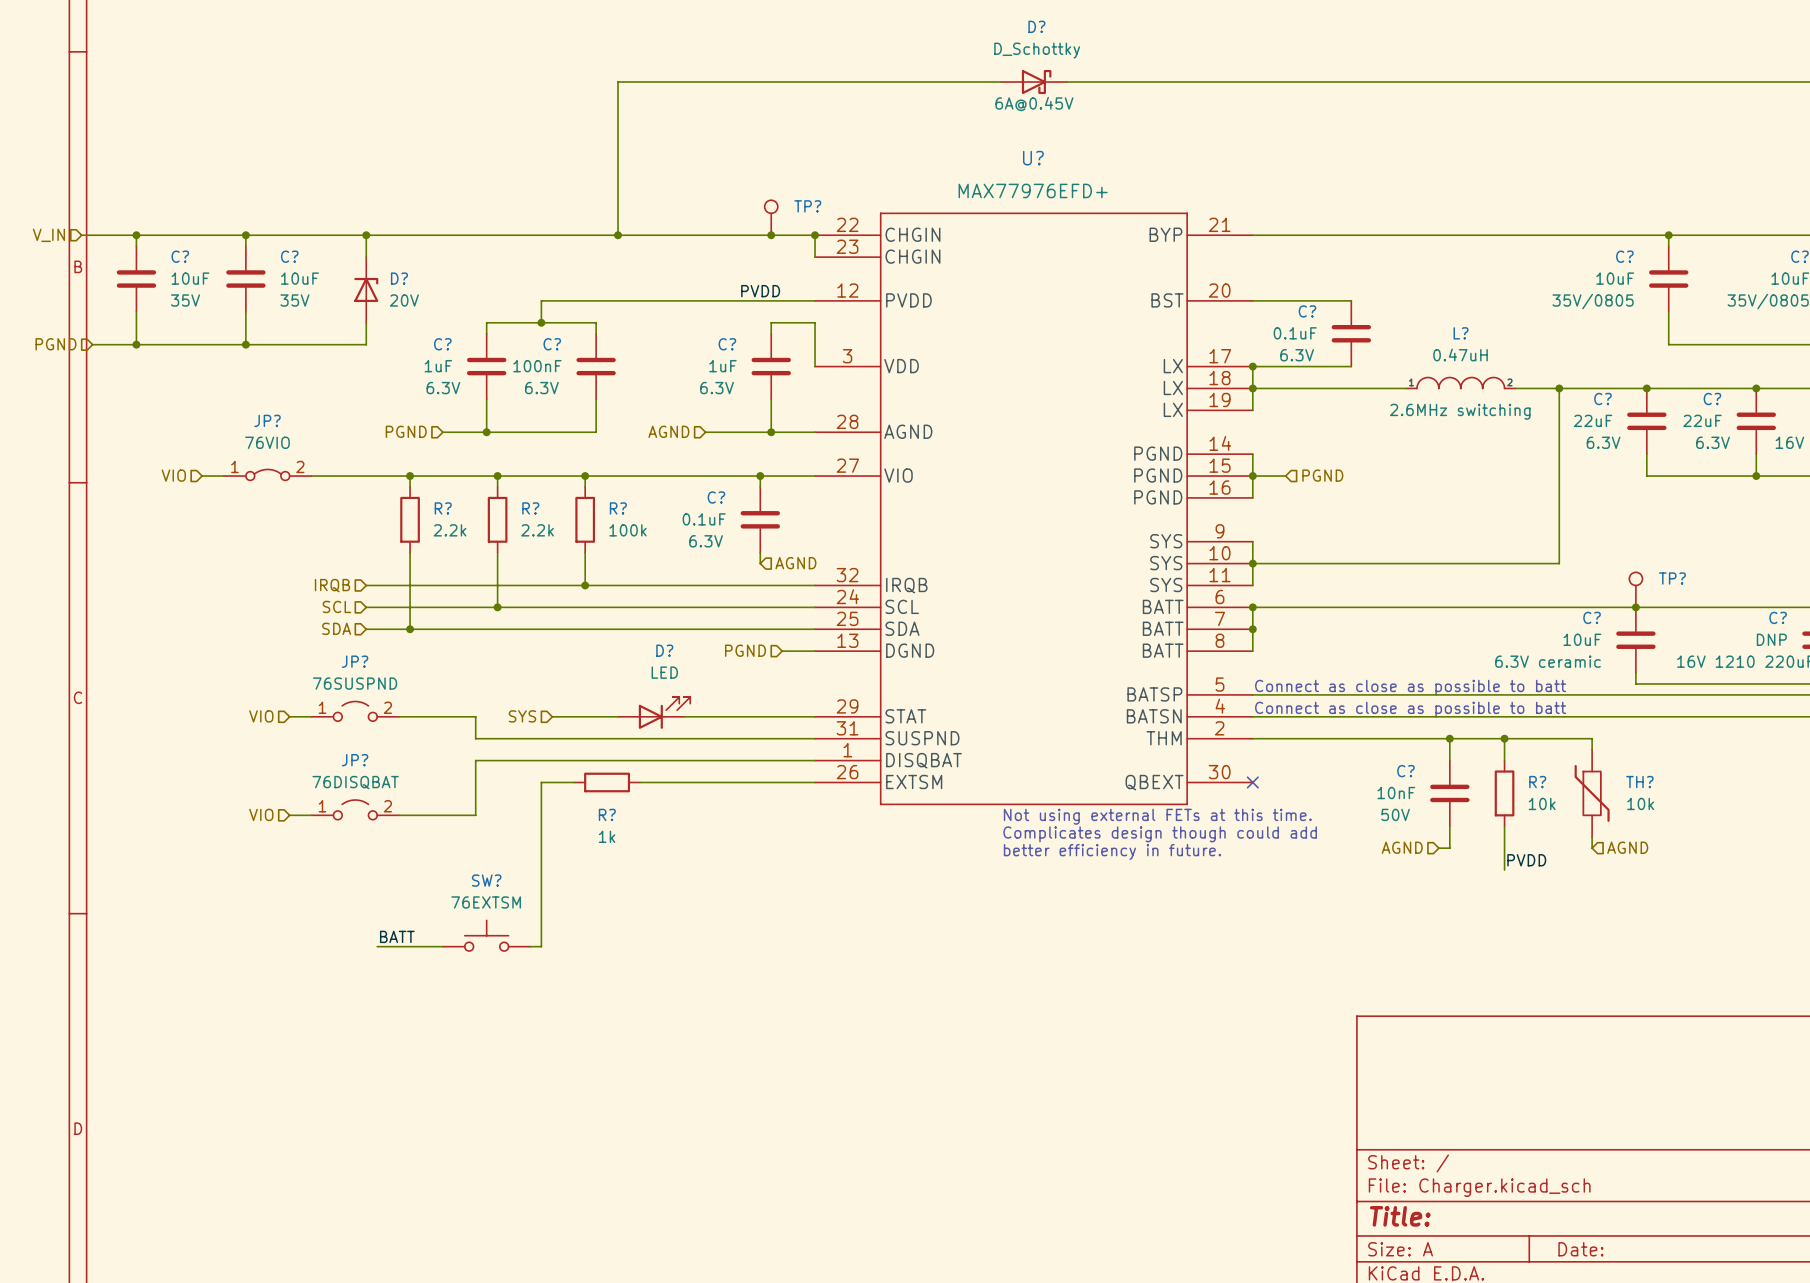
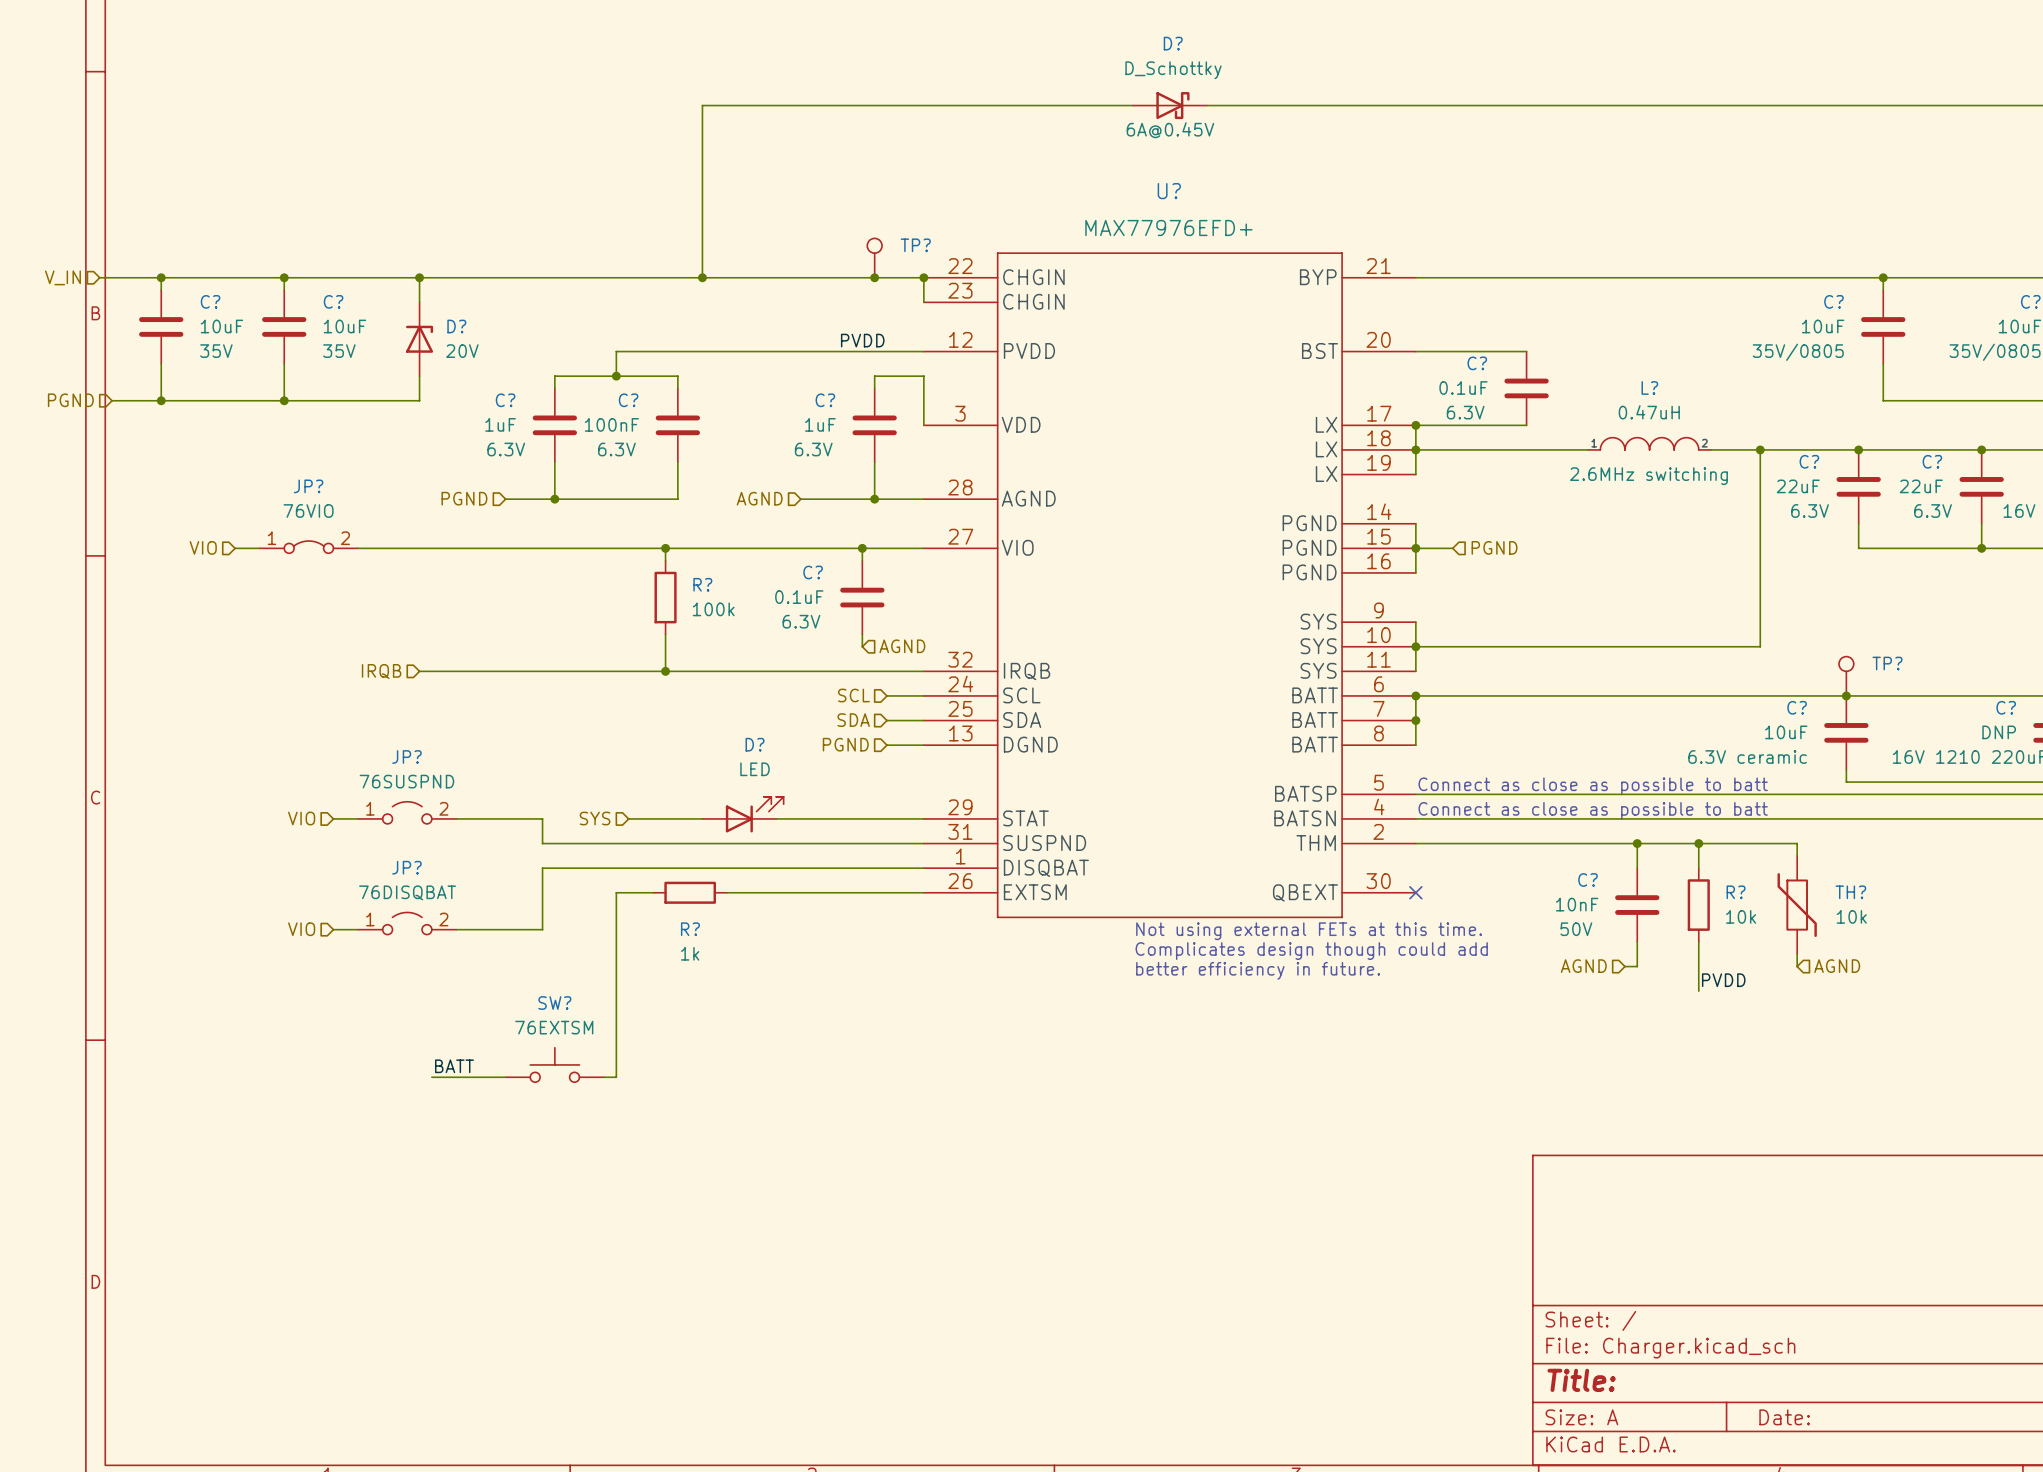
wire: (410, 476) (410, 486) -> none
junction: (410, 476) -> none
wire: (497, 476) (497, 486) -> none
junction: (497, 476) -> none
R?: 2.2k (410, 519) -> none
R?: 2.2k (497, 519) -> none
wire: (410, 552) (410, 629) -> none
wire: (497, 552) (497, 607) -> none
hierarchical label: SCL (336, 606) -> none
hierarchical label: none -> SCL (853, 695)
wire: (366, 607) (782, 607) -> none
junction: (497, 607) -> none
hierarchical label: SDA (336, 628) -> none
hierarchical label: none -> SDA (853, 720)
wire: (366, 629) (782, 629) -> none
junction: (410, 629) -> none

